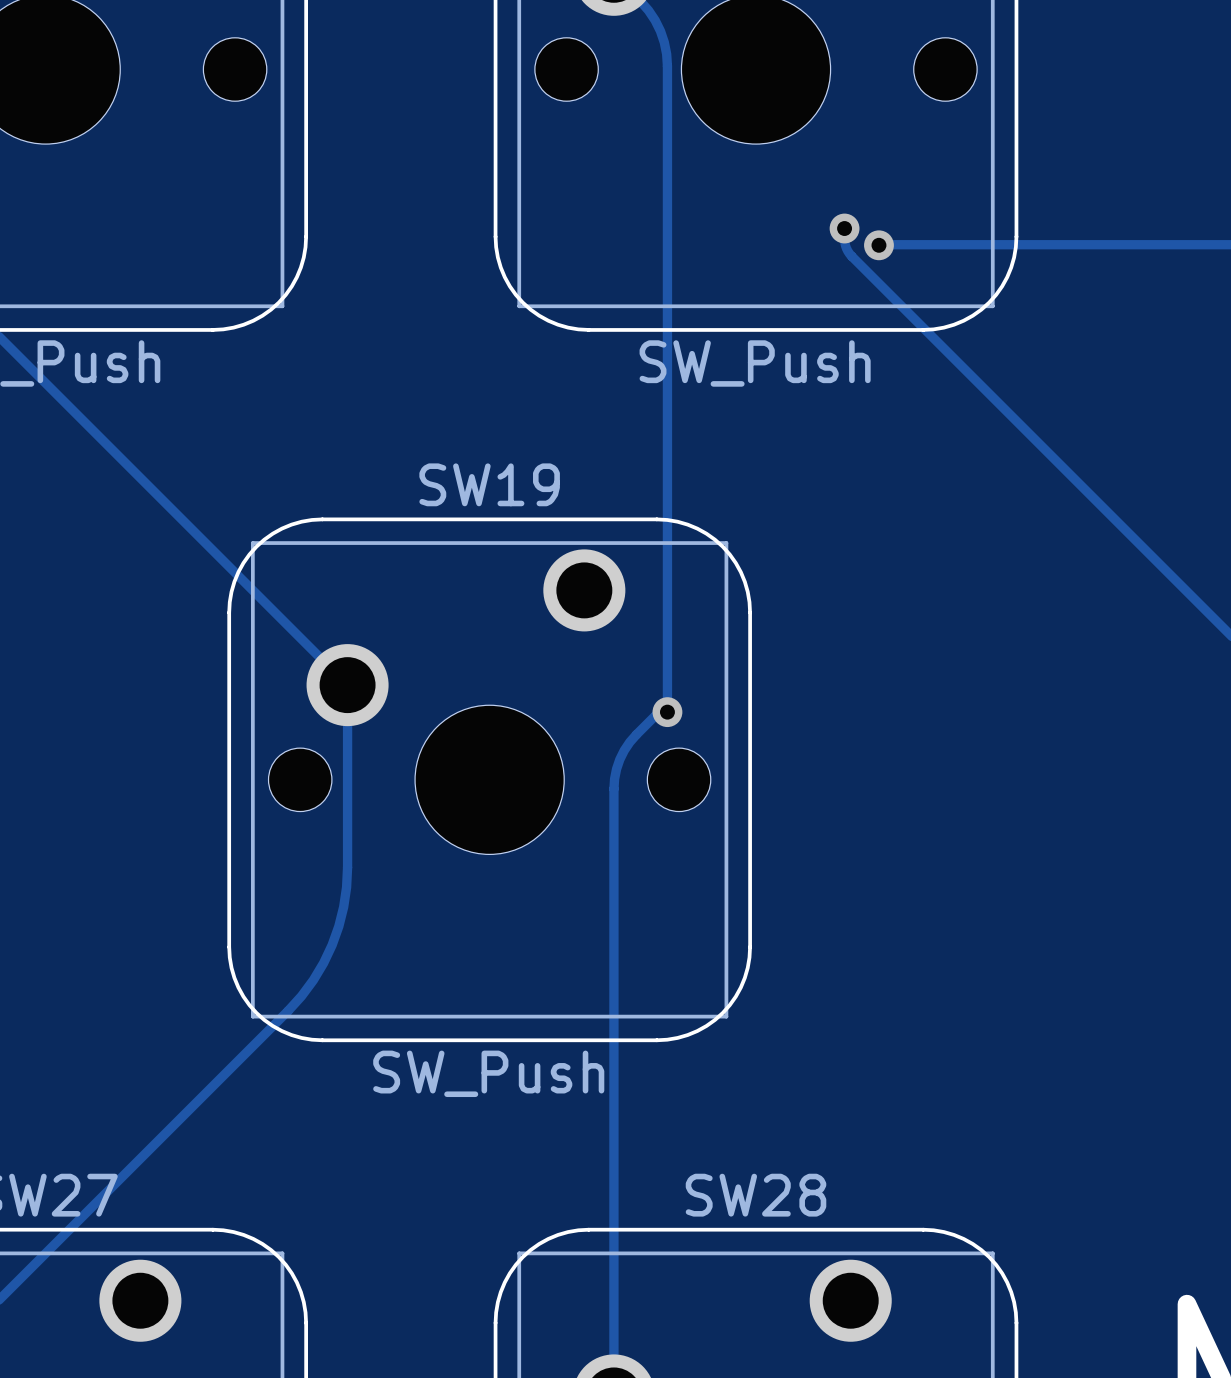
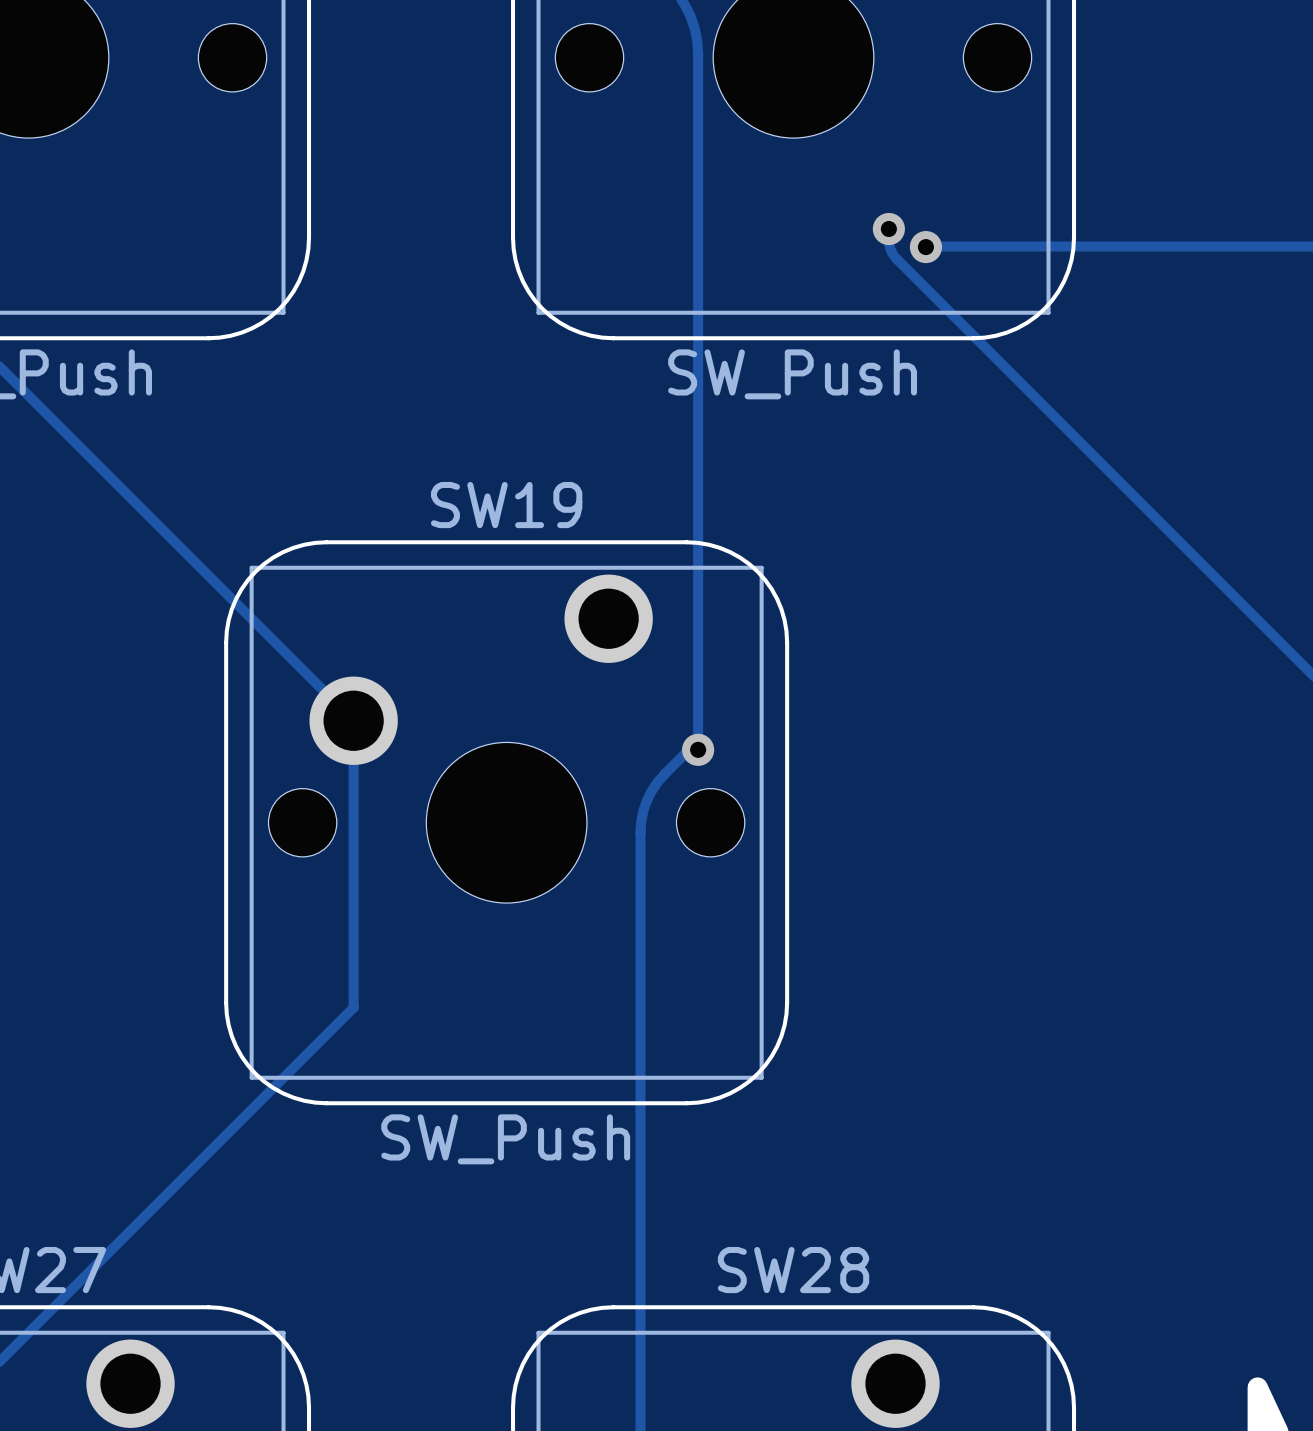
track: (347, 867) (343, 907) (332, 945) (313, 980) (288, 1010) -> (353, 917) (353, 1007) (289, 1071)

